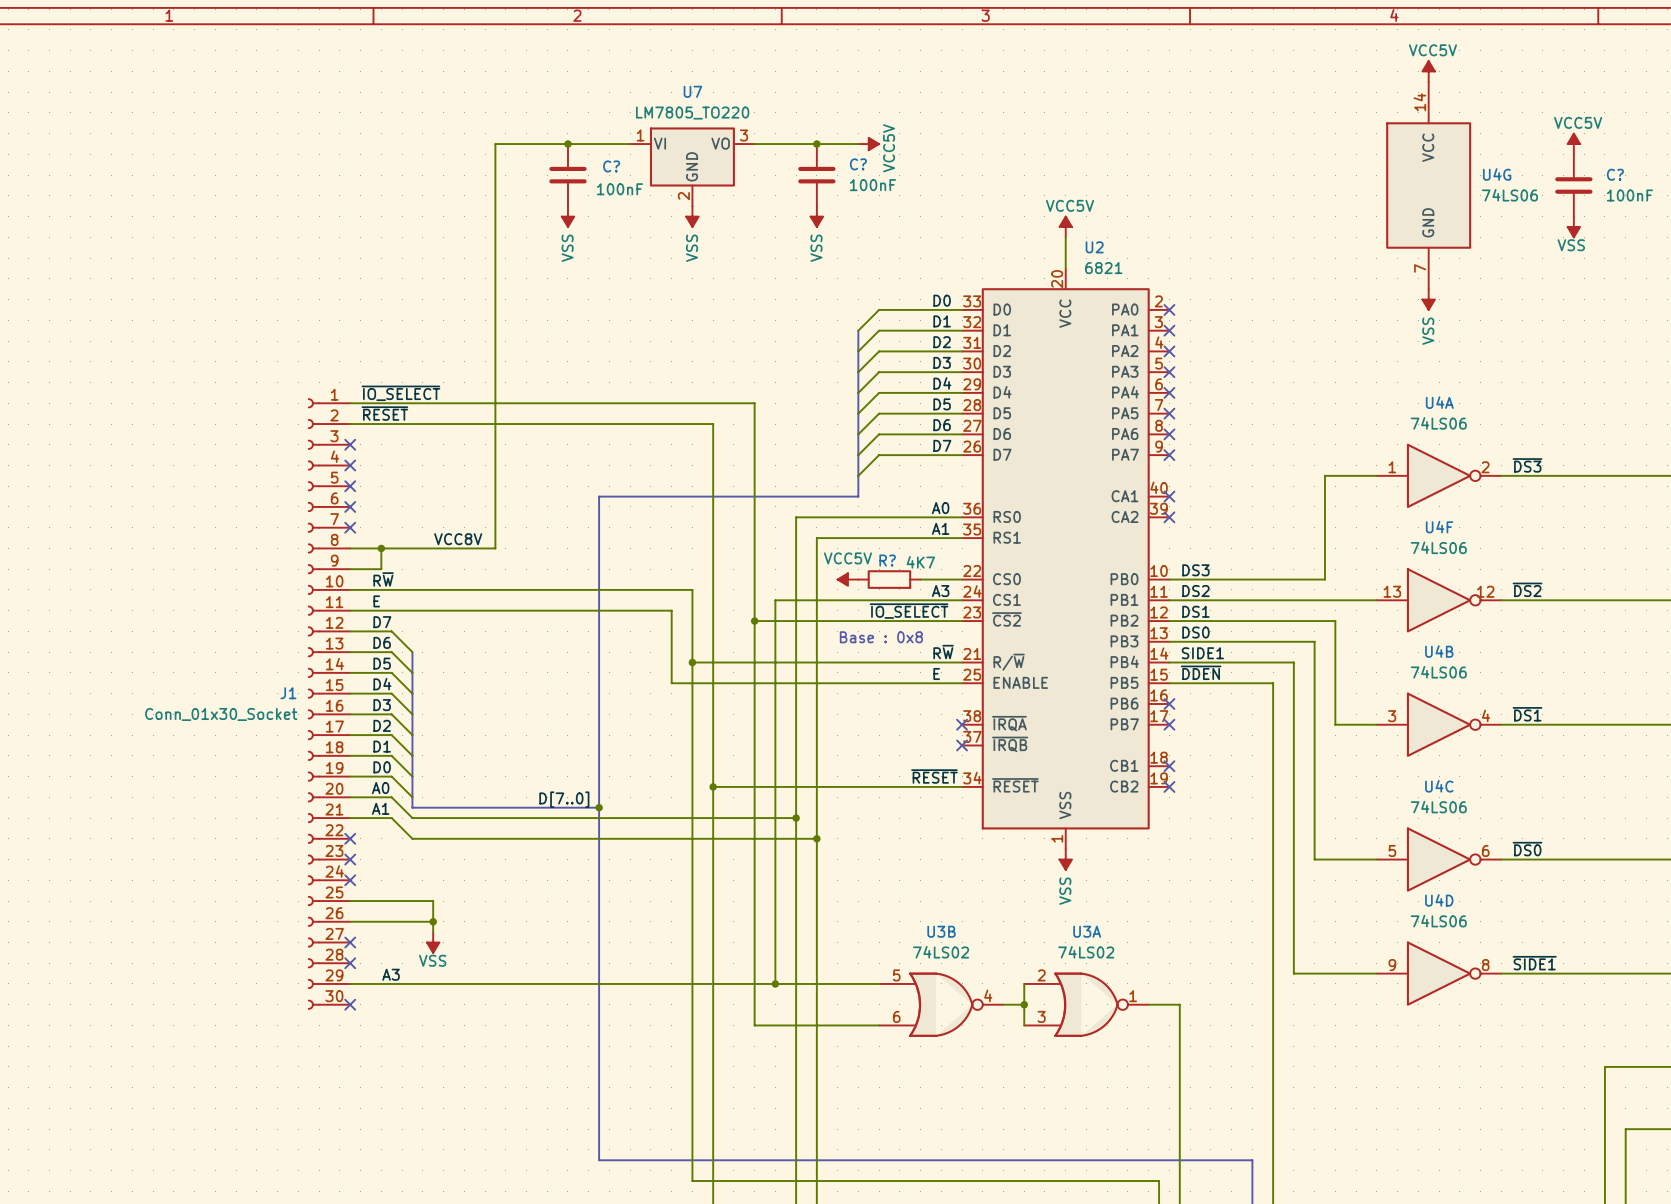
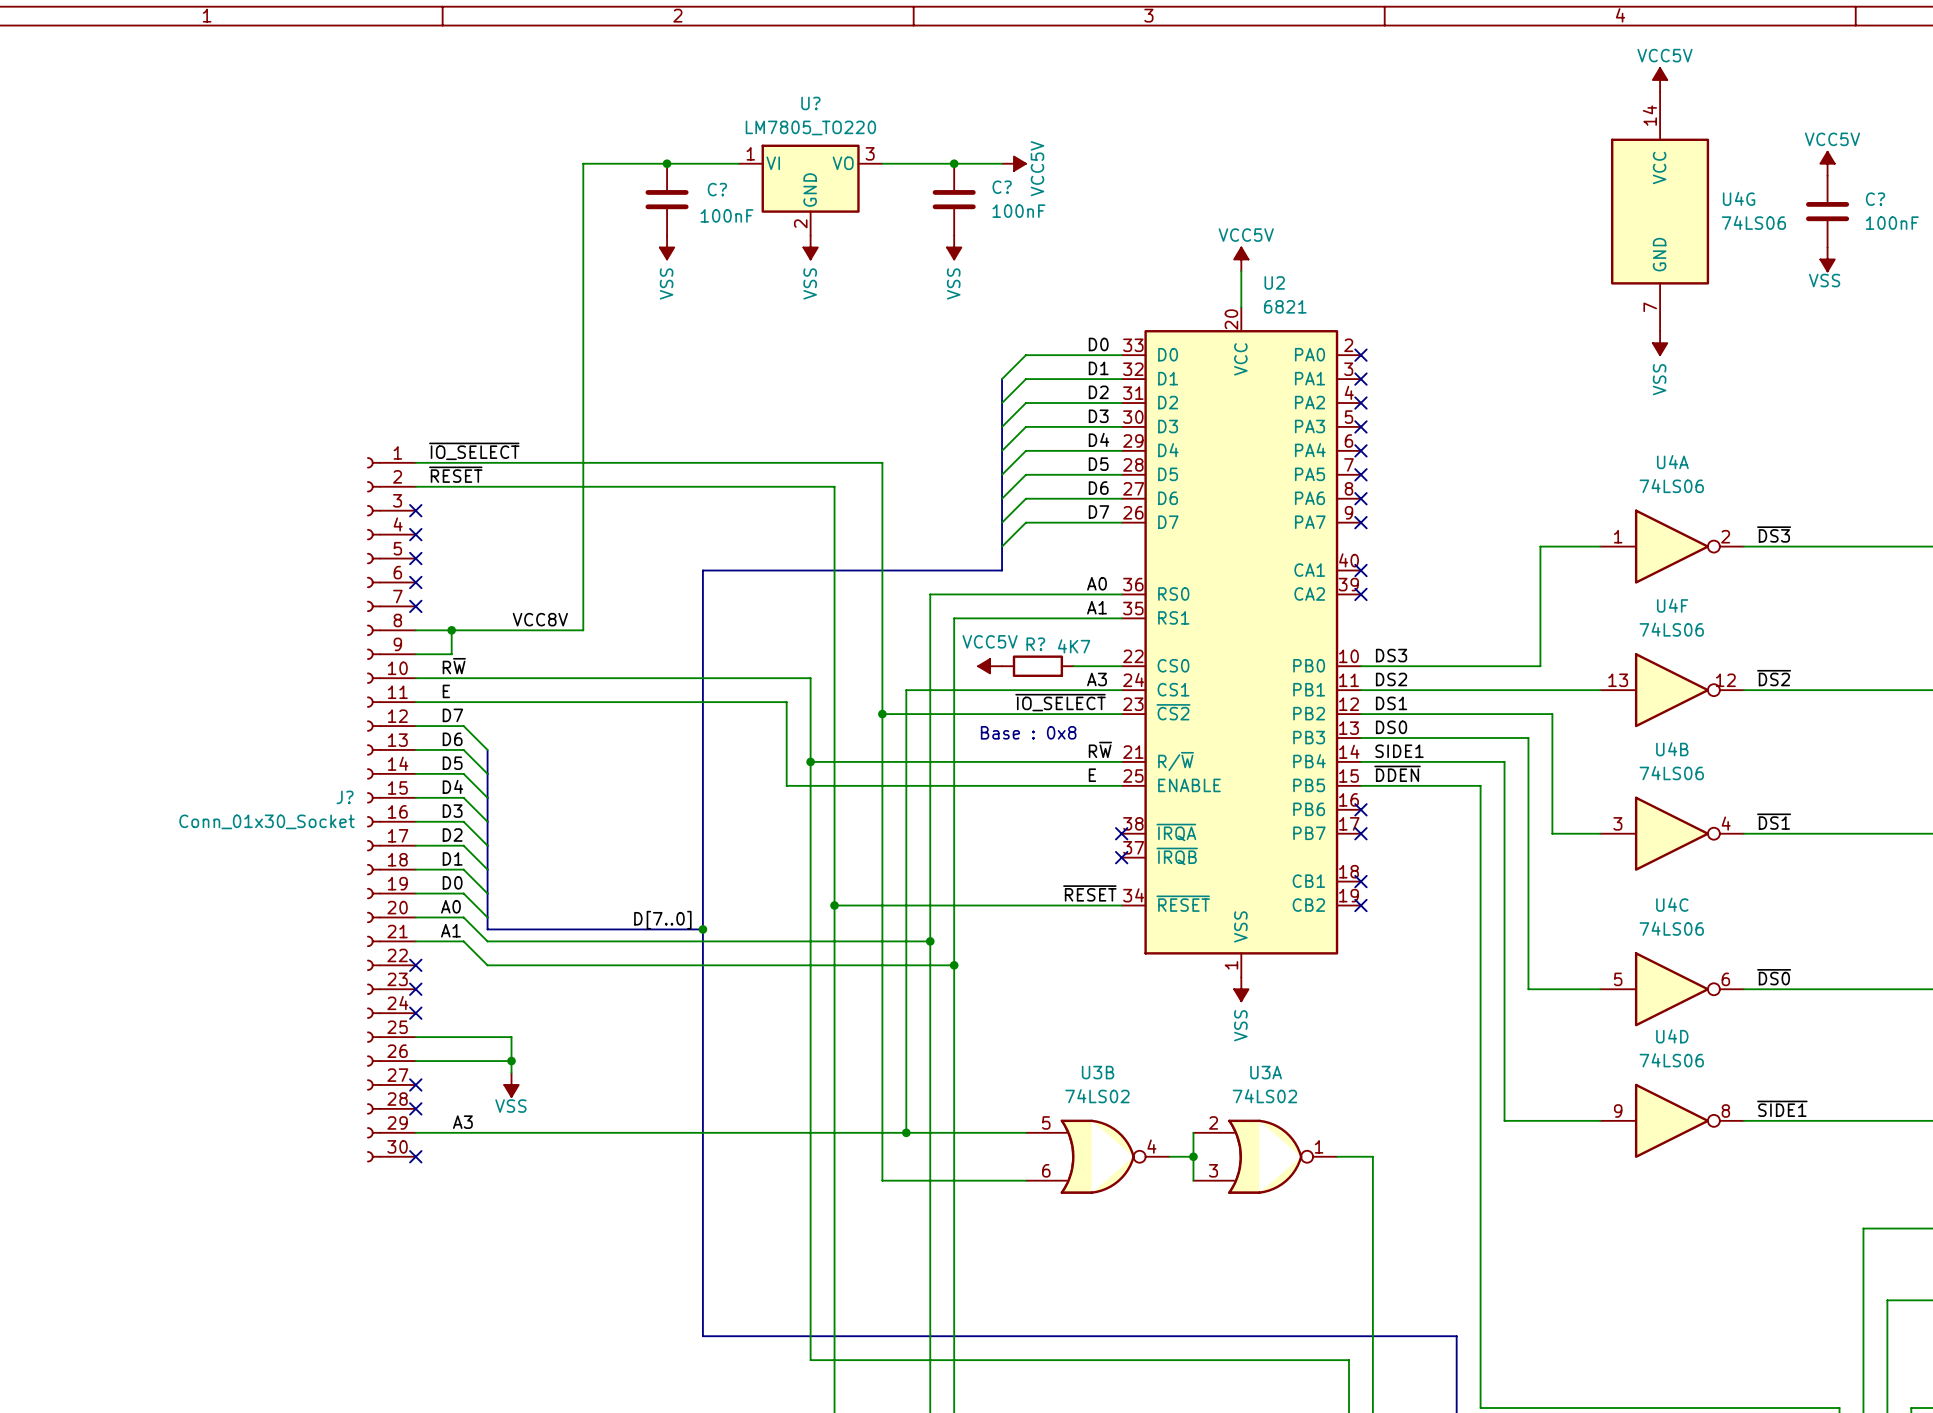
U7 name: U7 (692, 91) -> U? (810, 103)
J1 name: J1 (288, 693) -> J? (345, 797)

